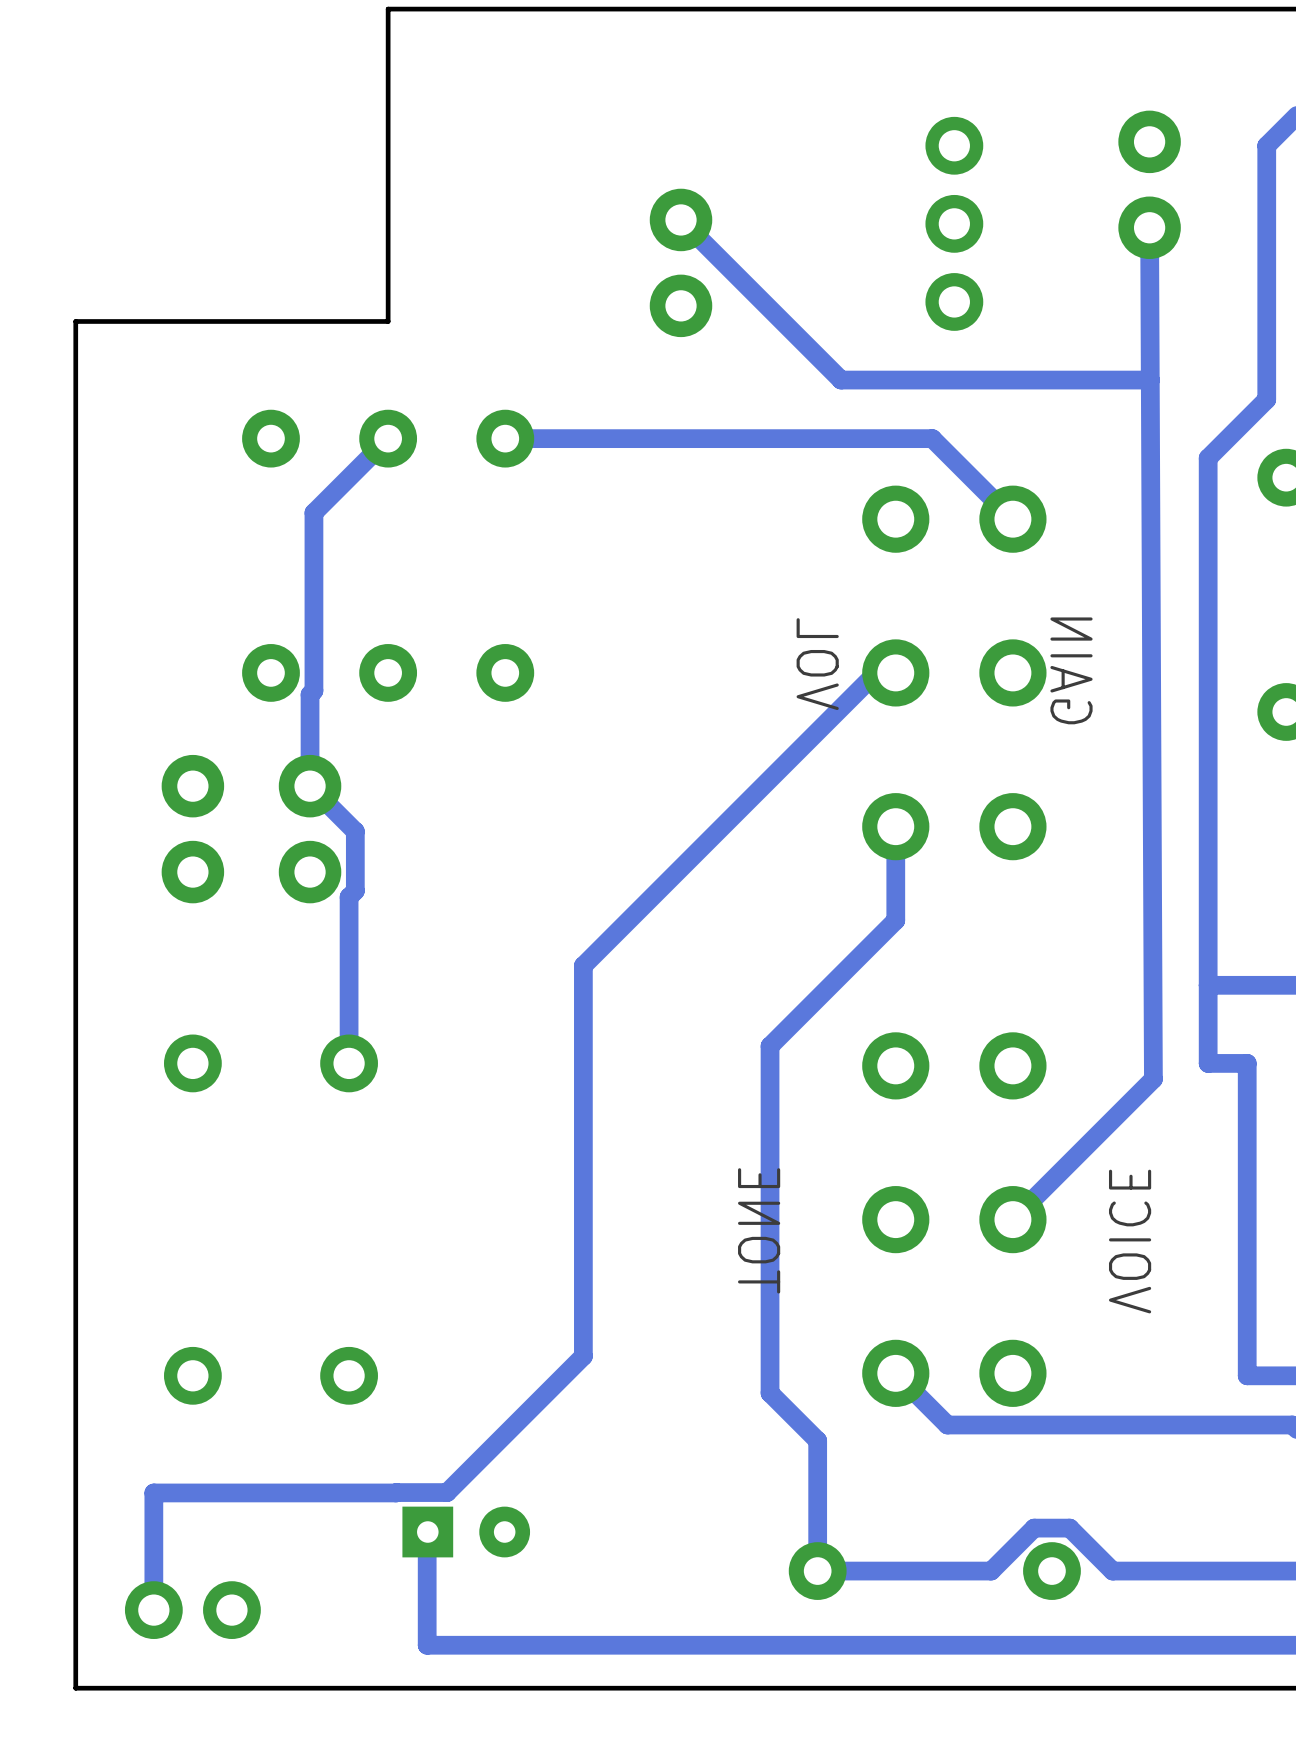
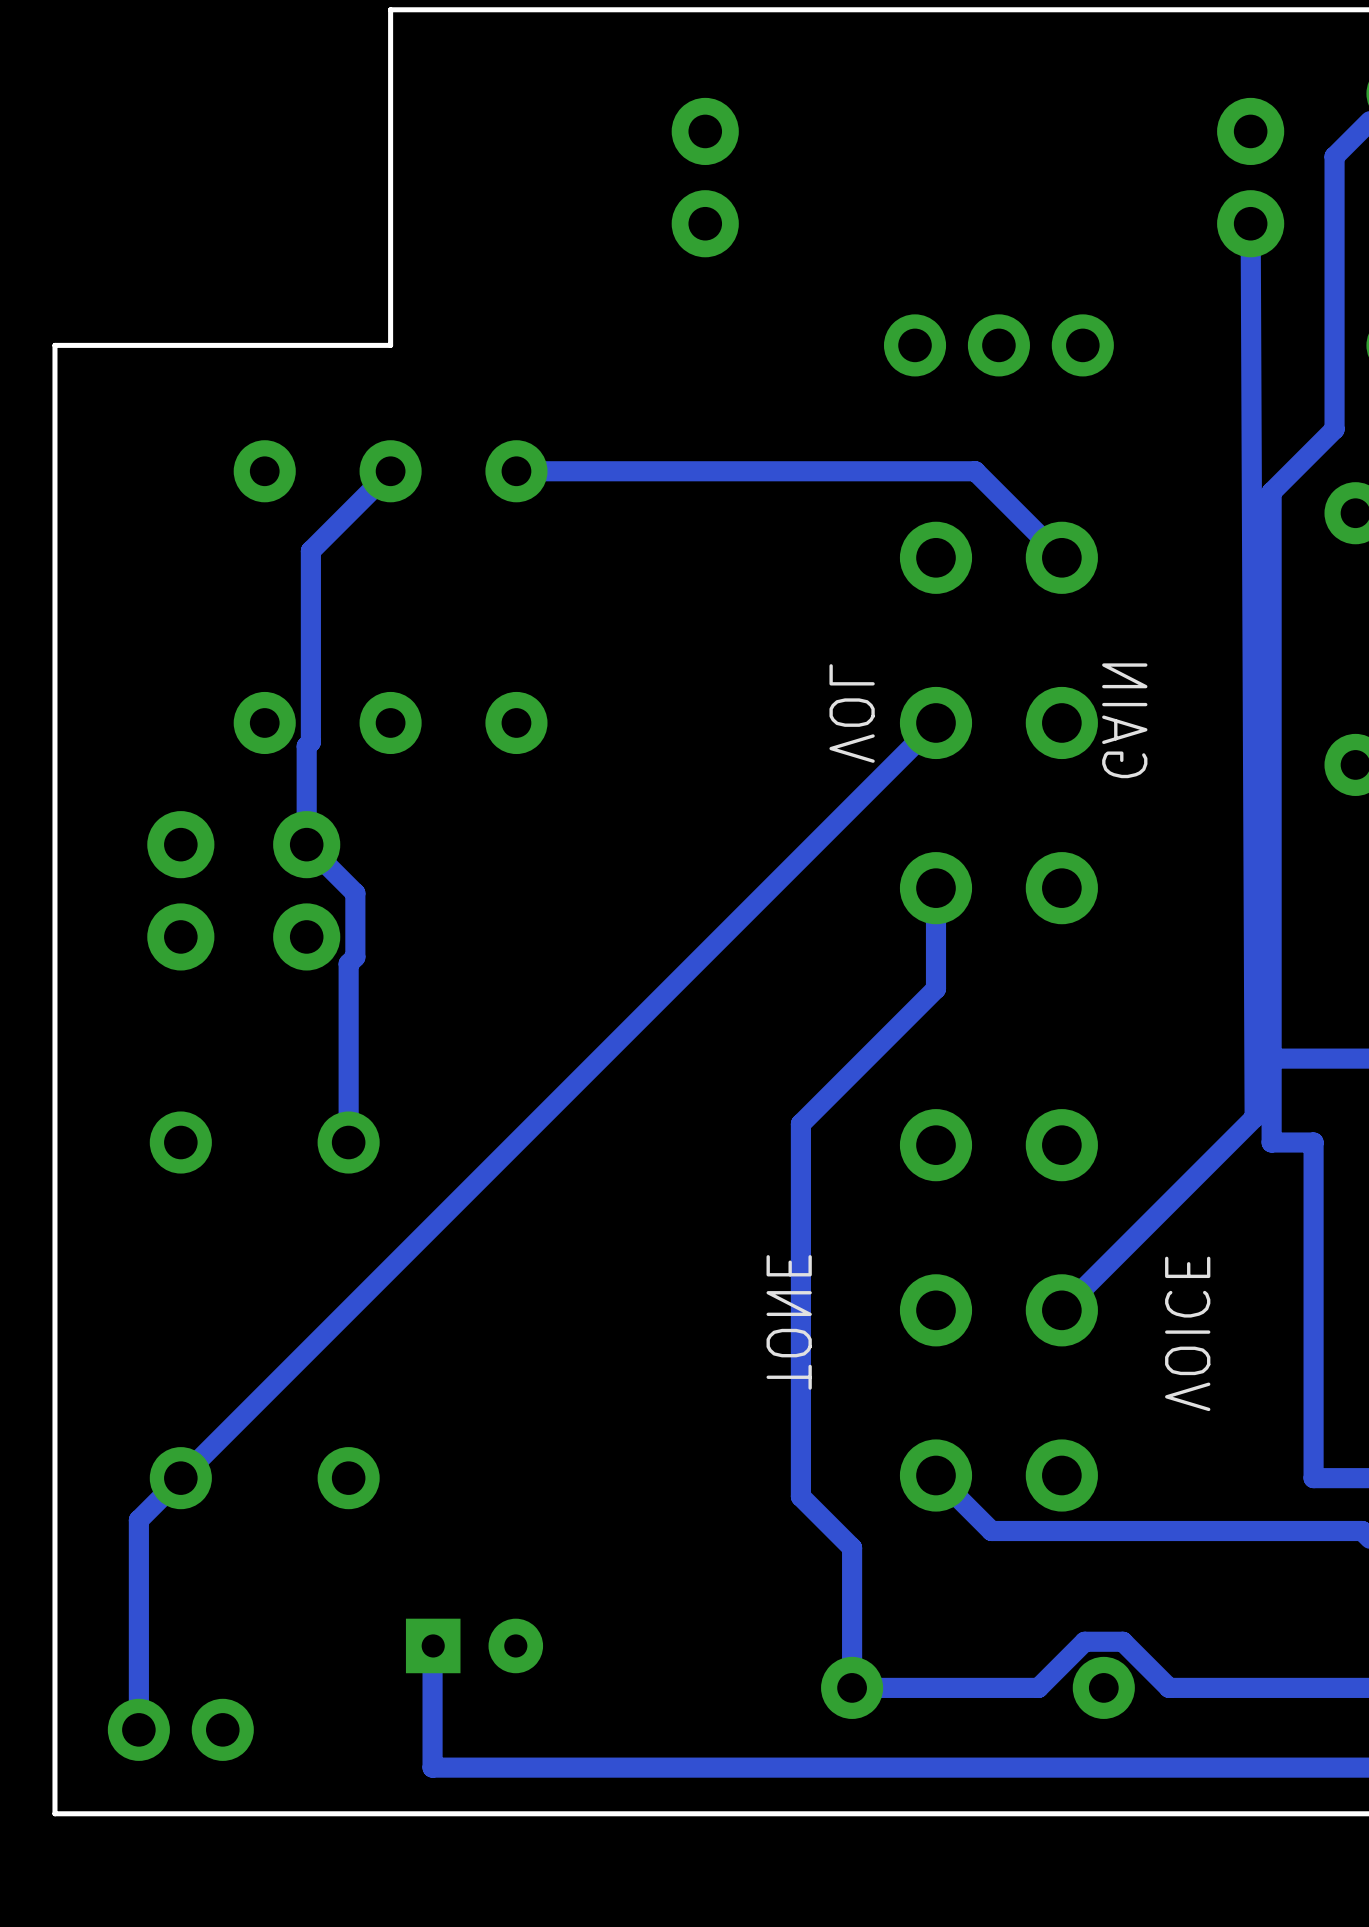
part position: (1149, 184) -> (1250, 177)
track: (681, 219) (841, 380) (1150, 380) -> none
part rotation: 0° (954, 223) -> 90° clockwise (998, 345)
track: (1149, 227) (1153, 1079) -> (1250, 223) (1254, 1117) (1212, 1159)
part position: (681, 262) -> (705, 177)
track: (895, 672) (876, 672) (583, 965) (583, 1356) (447, 1492) (396, 1492) -> (936, 722) (138, 1520) (138, 1604)
track: (396, 1492) (153, 1492) -> none

